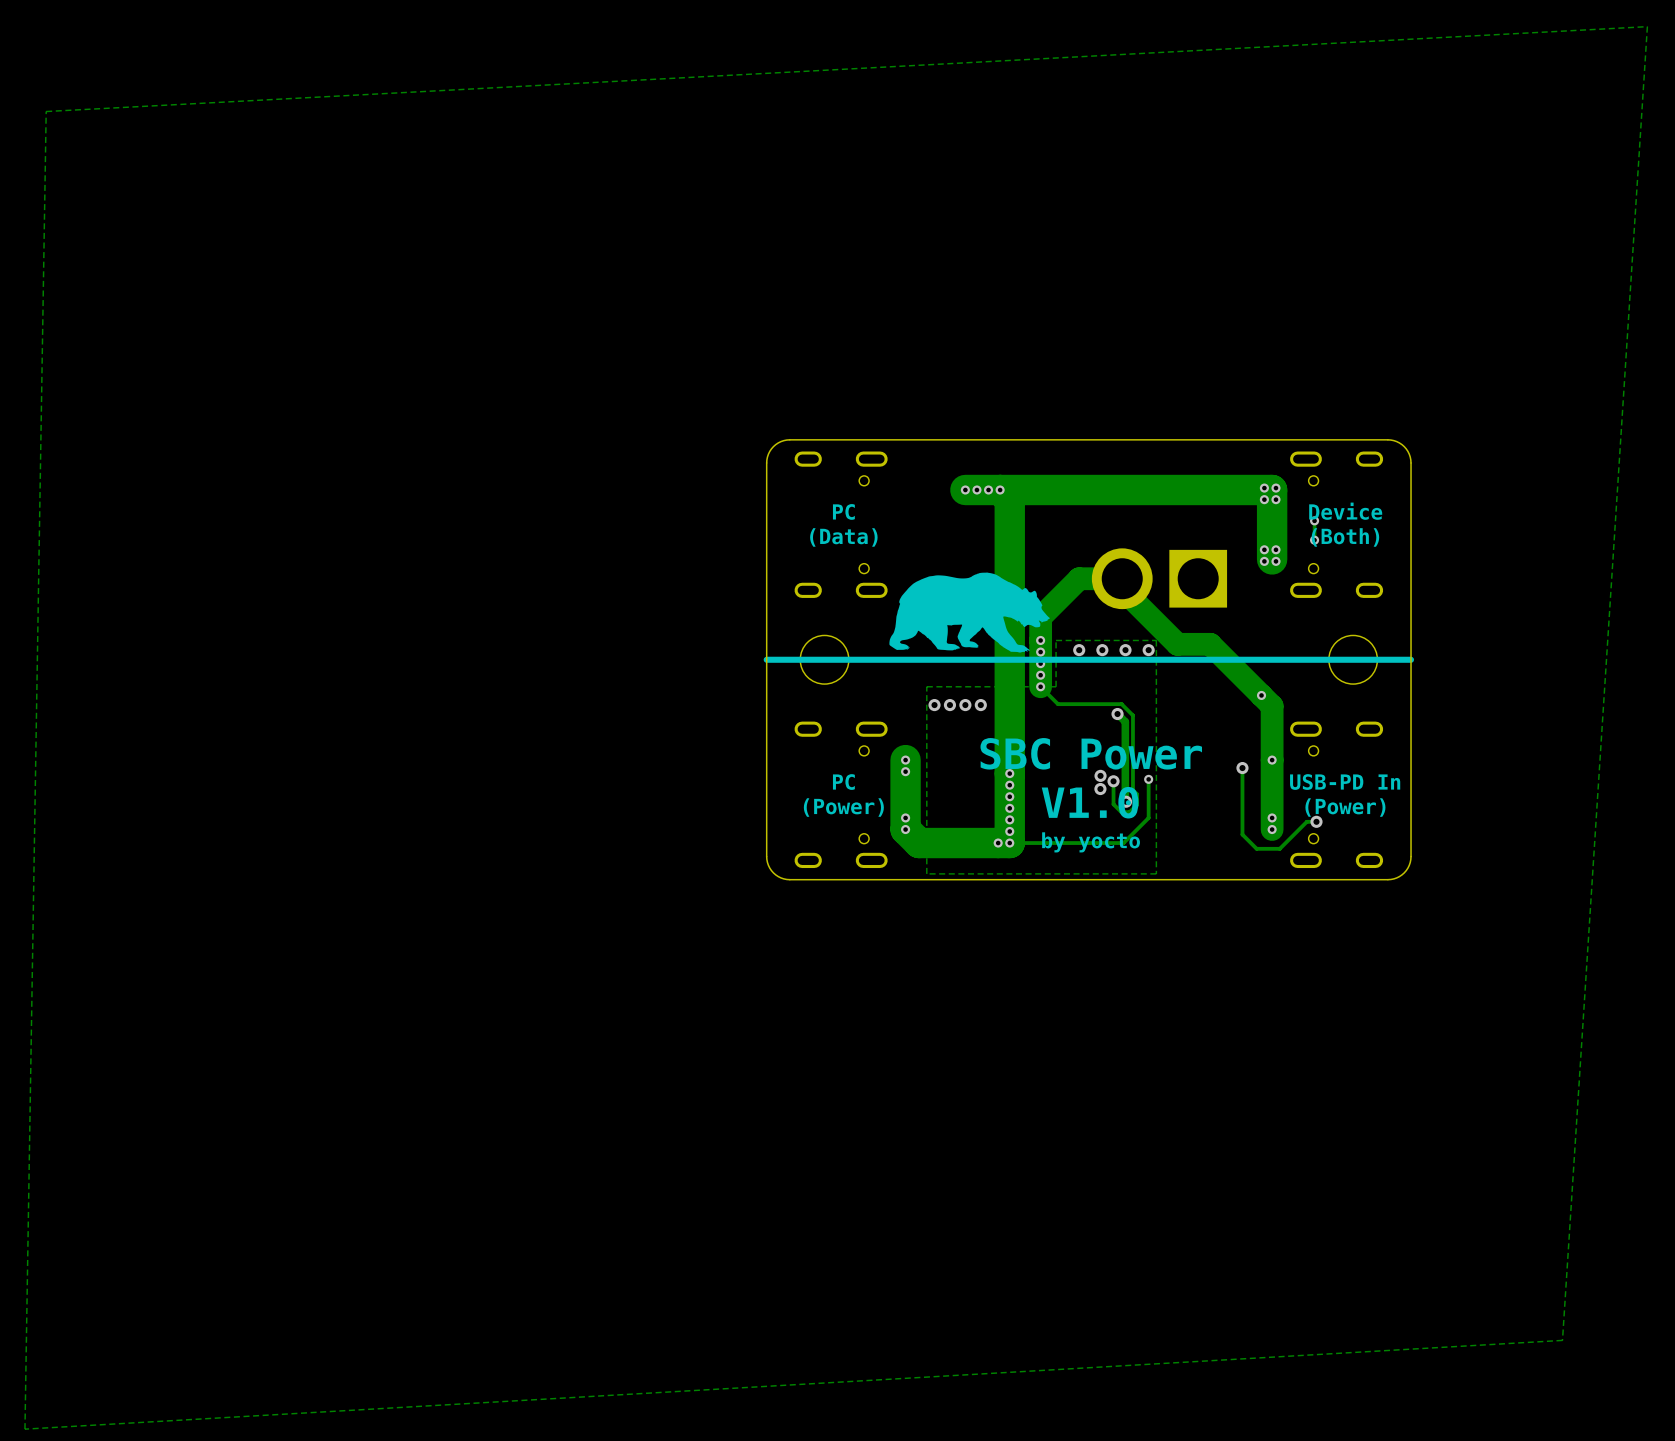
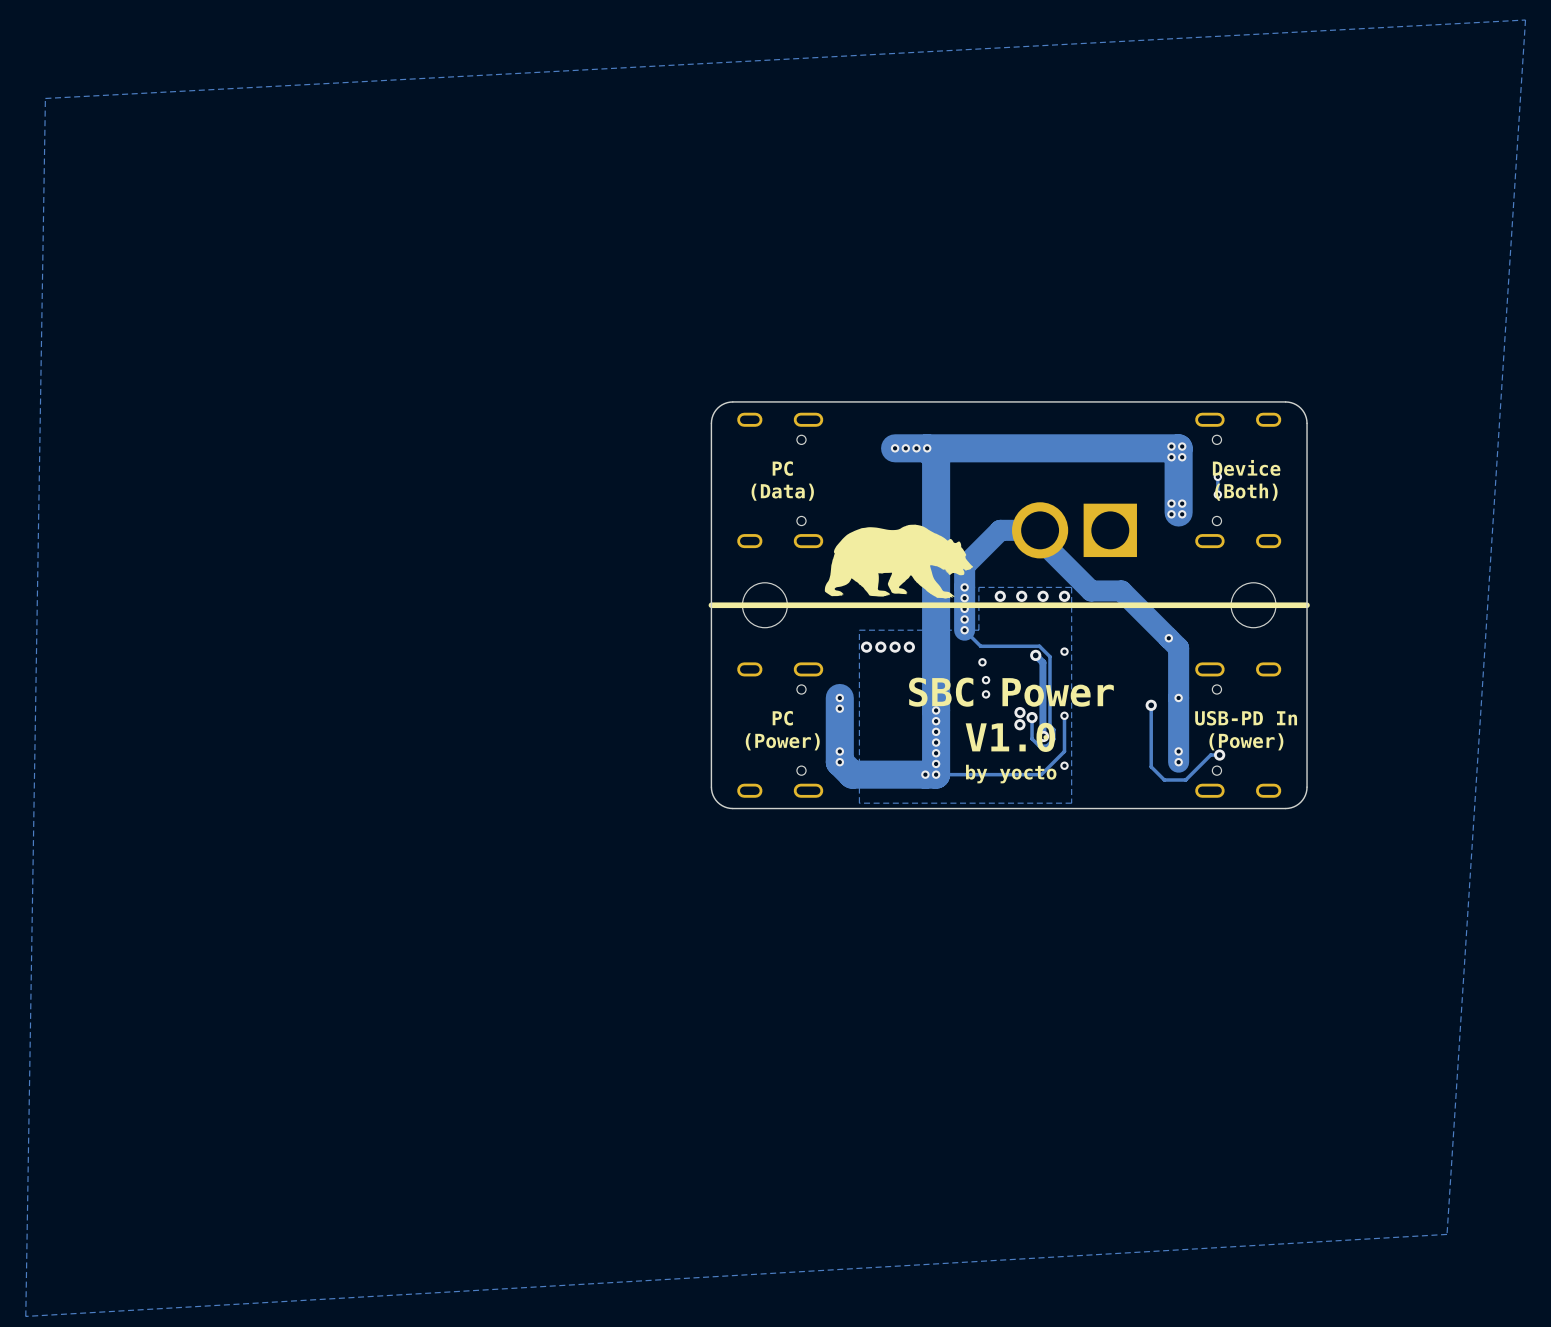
via: none -> (1064, 651)
via: none -> (982, 662)
via: none -> (986, 680)
via: none -> (986, 694)
via: none -> (1064, 765)

